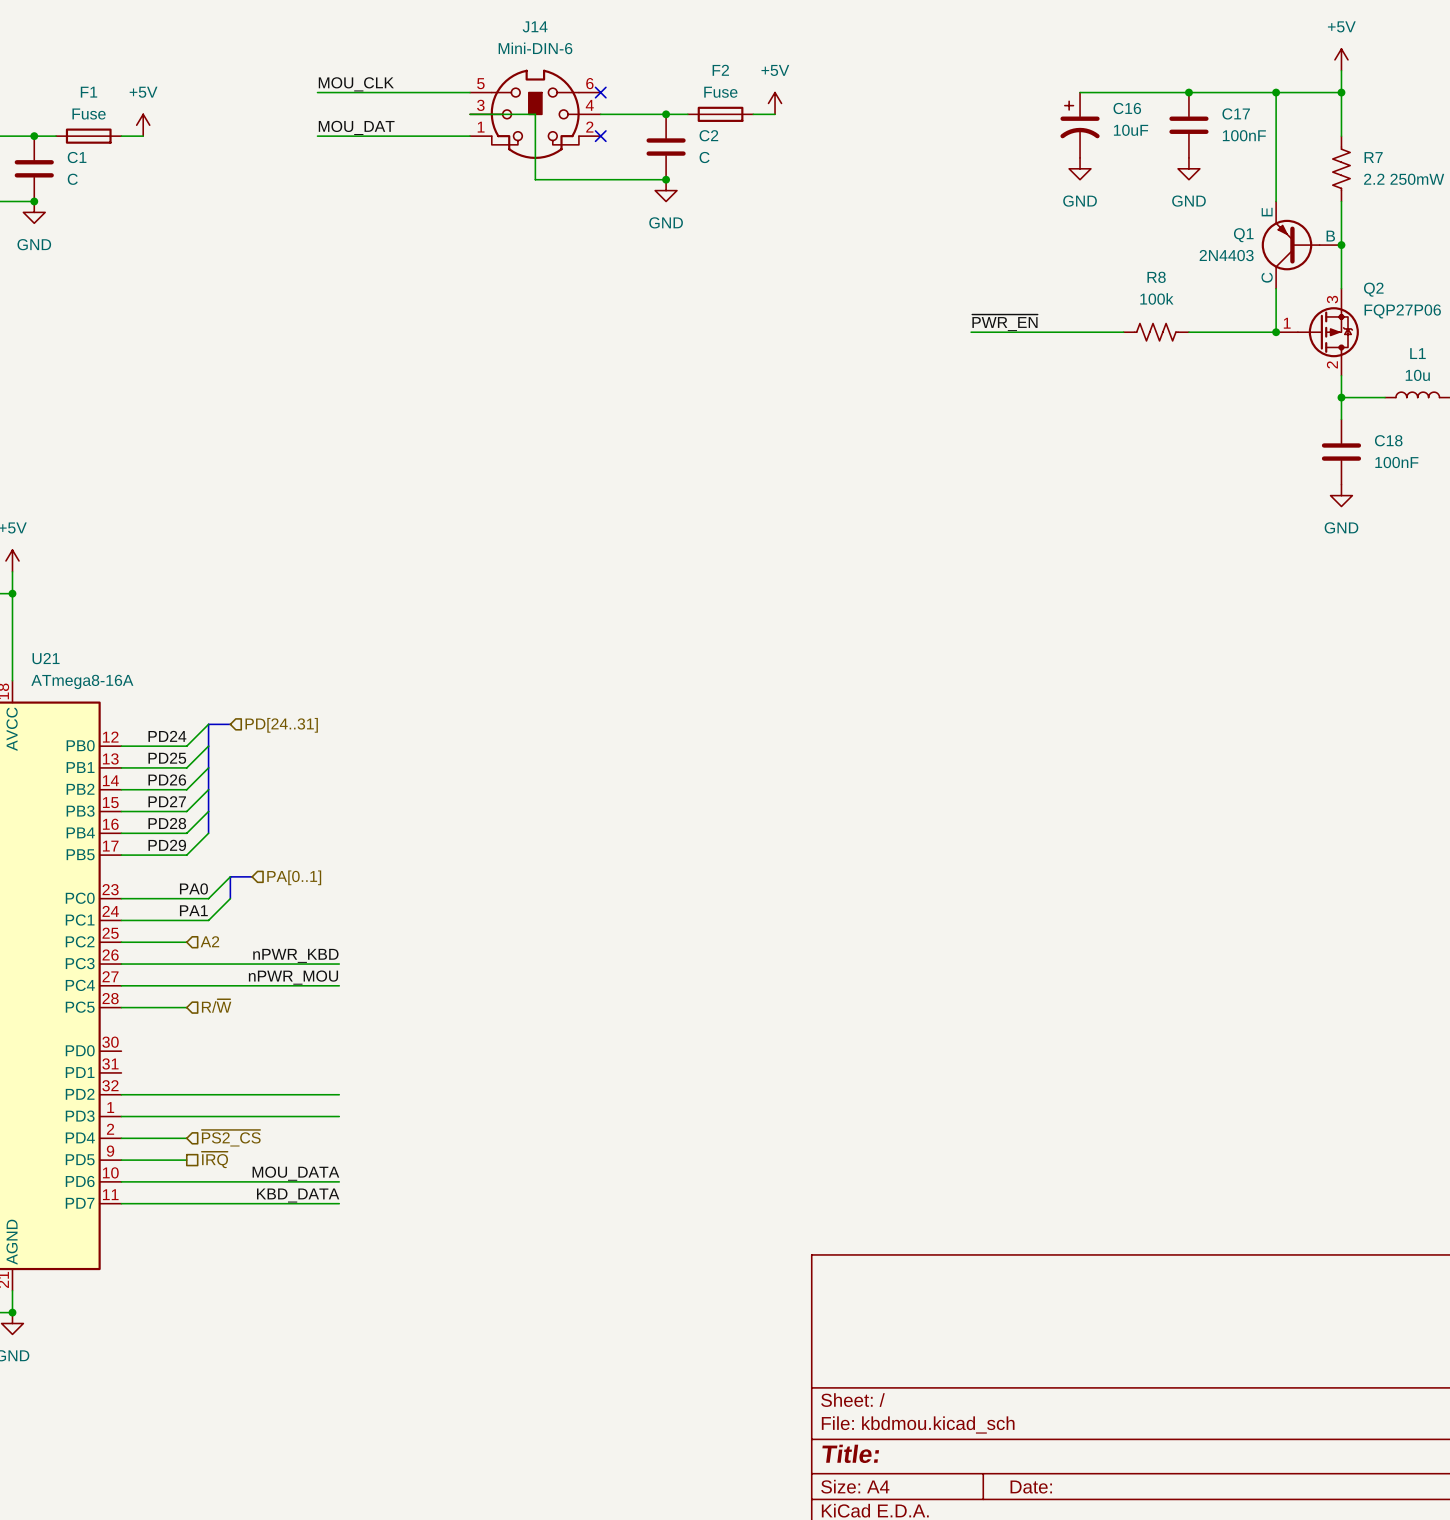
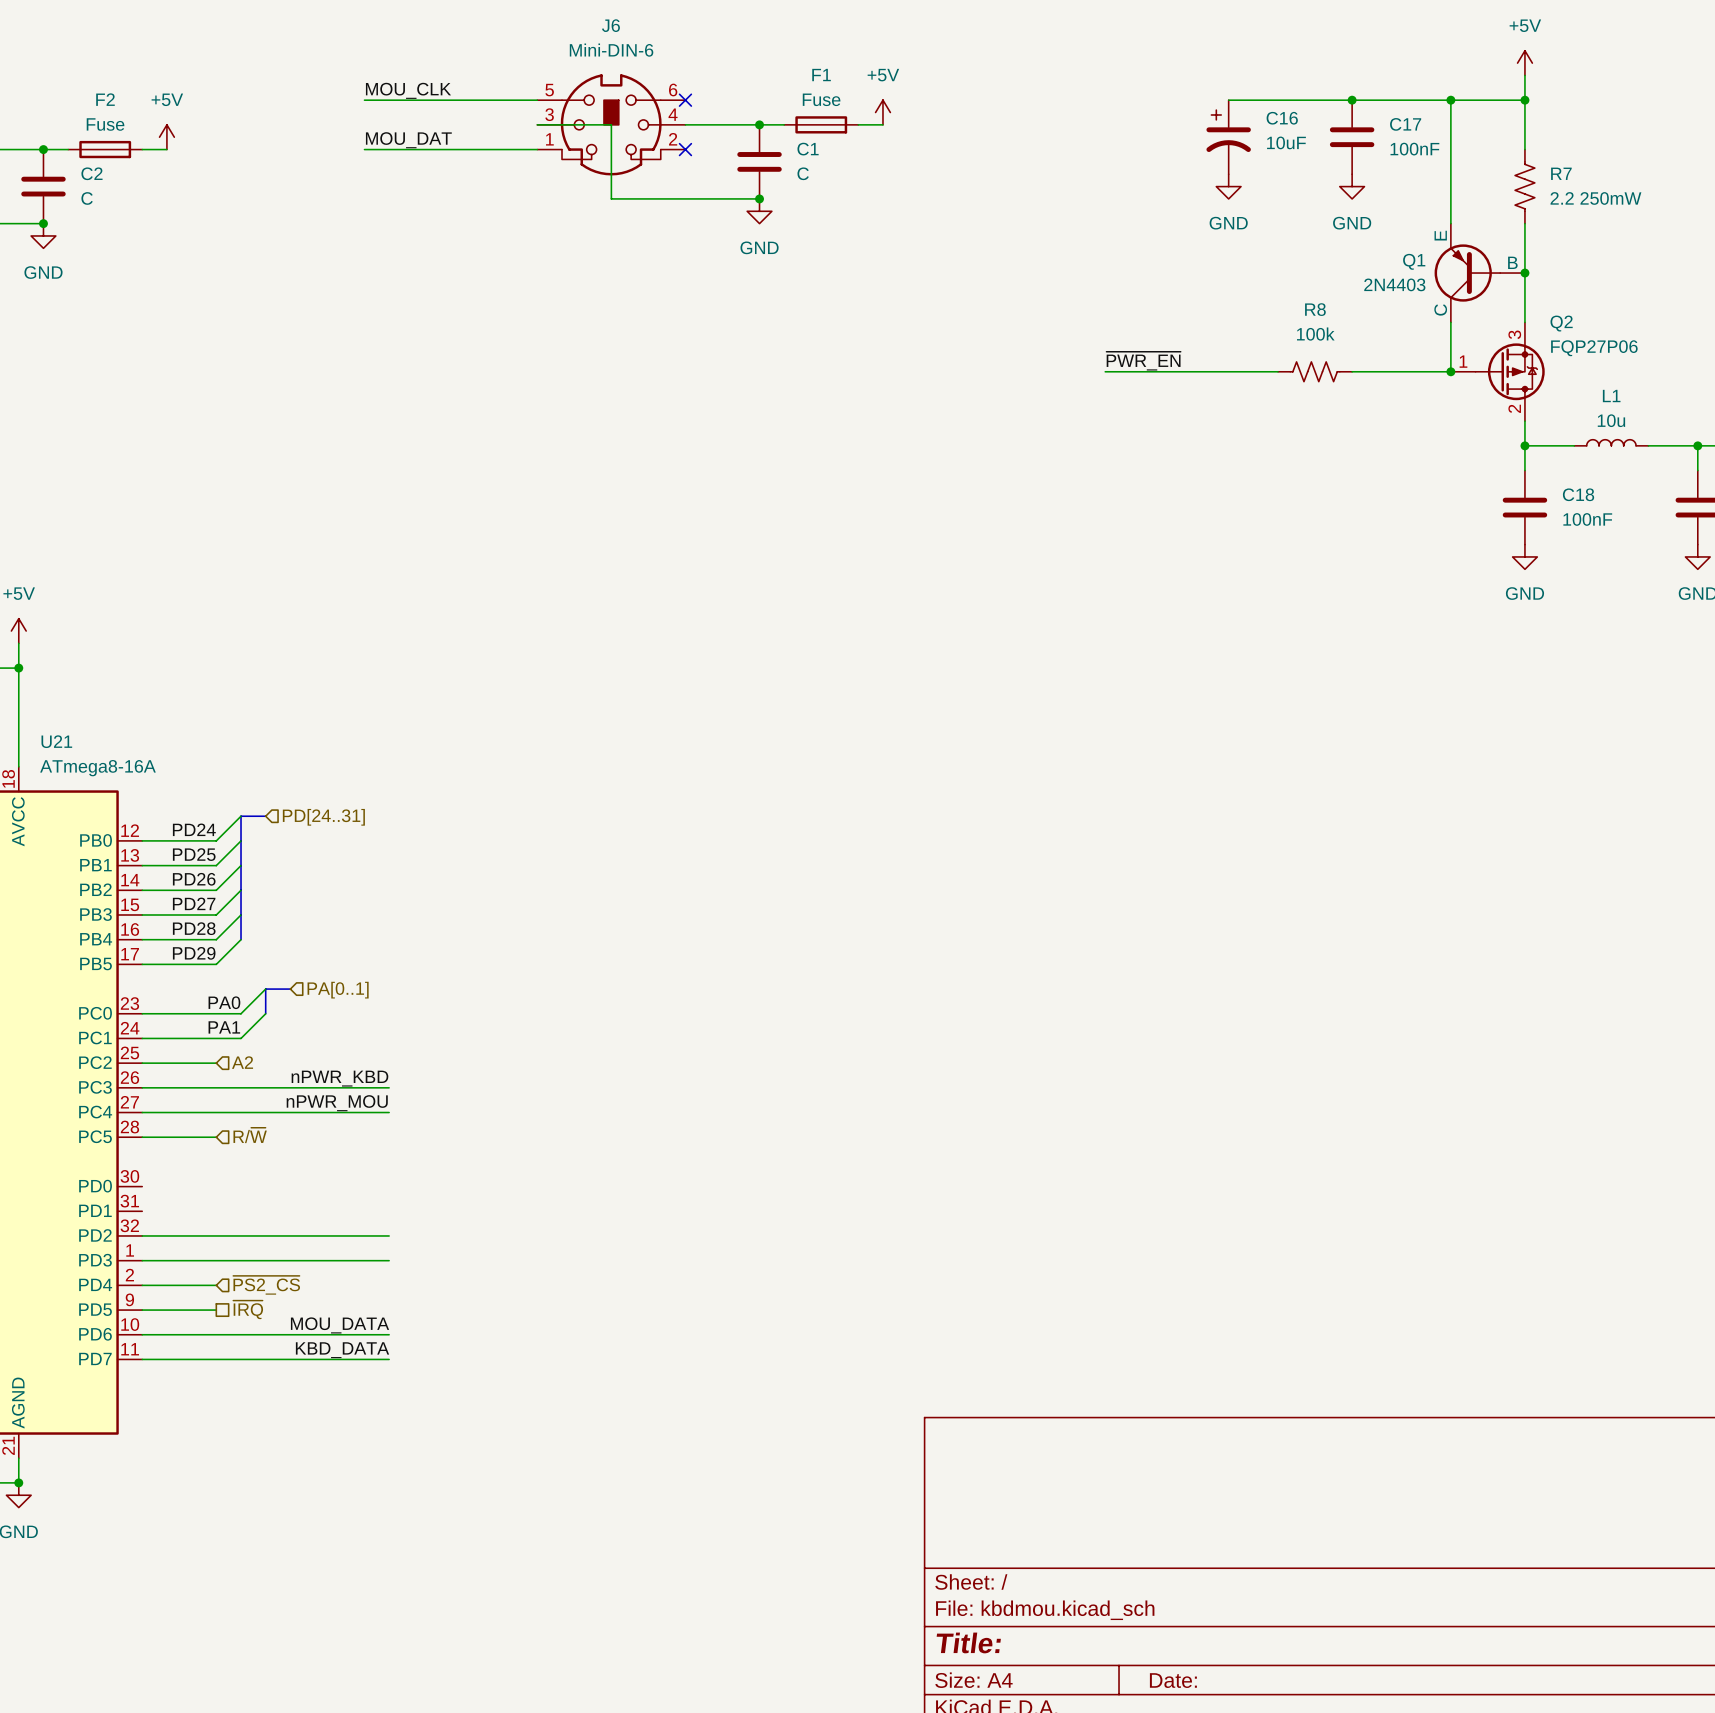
J14 name: J14 (535, 26) -> J6 (610, 25)
F2 name: F2 (720, 70) -> F1 (821, 75)
F1 name: F1 (89, 92) -> F2 (105, 99)
C2 name: C2 (708, 135) -> C1 (808, 149)
C1 name: C1 (77, 157) -> C2 (91, 173)

